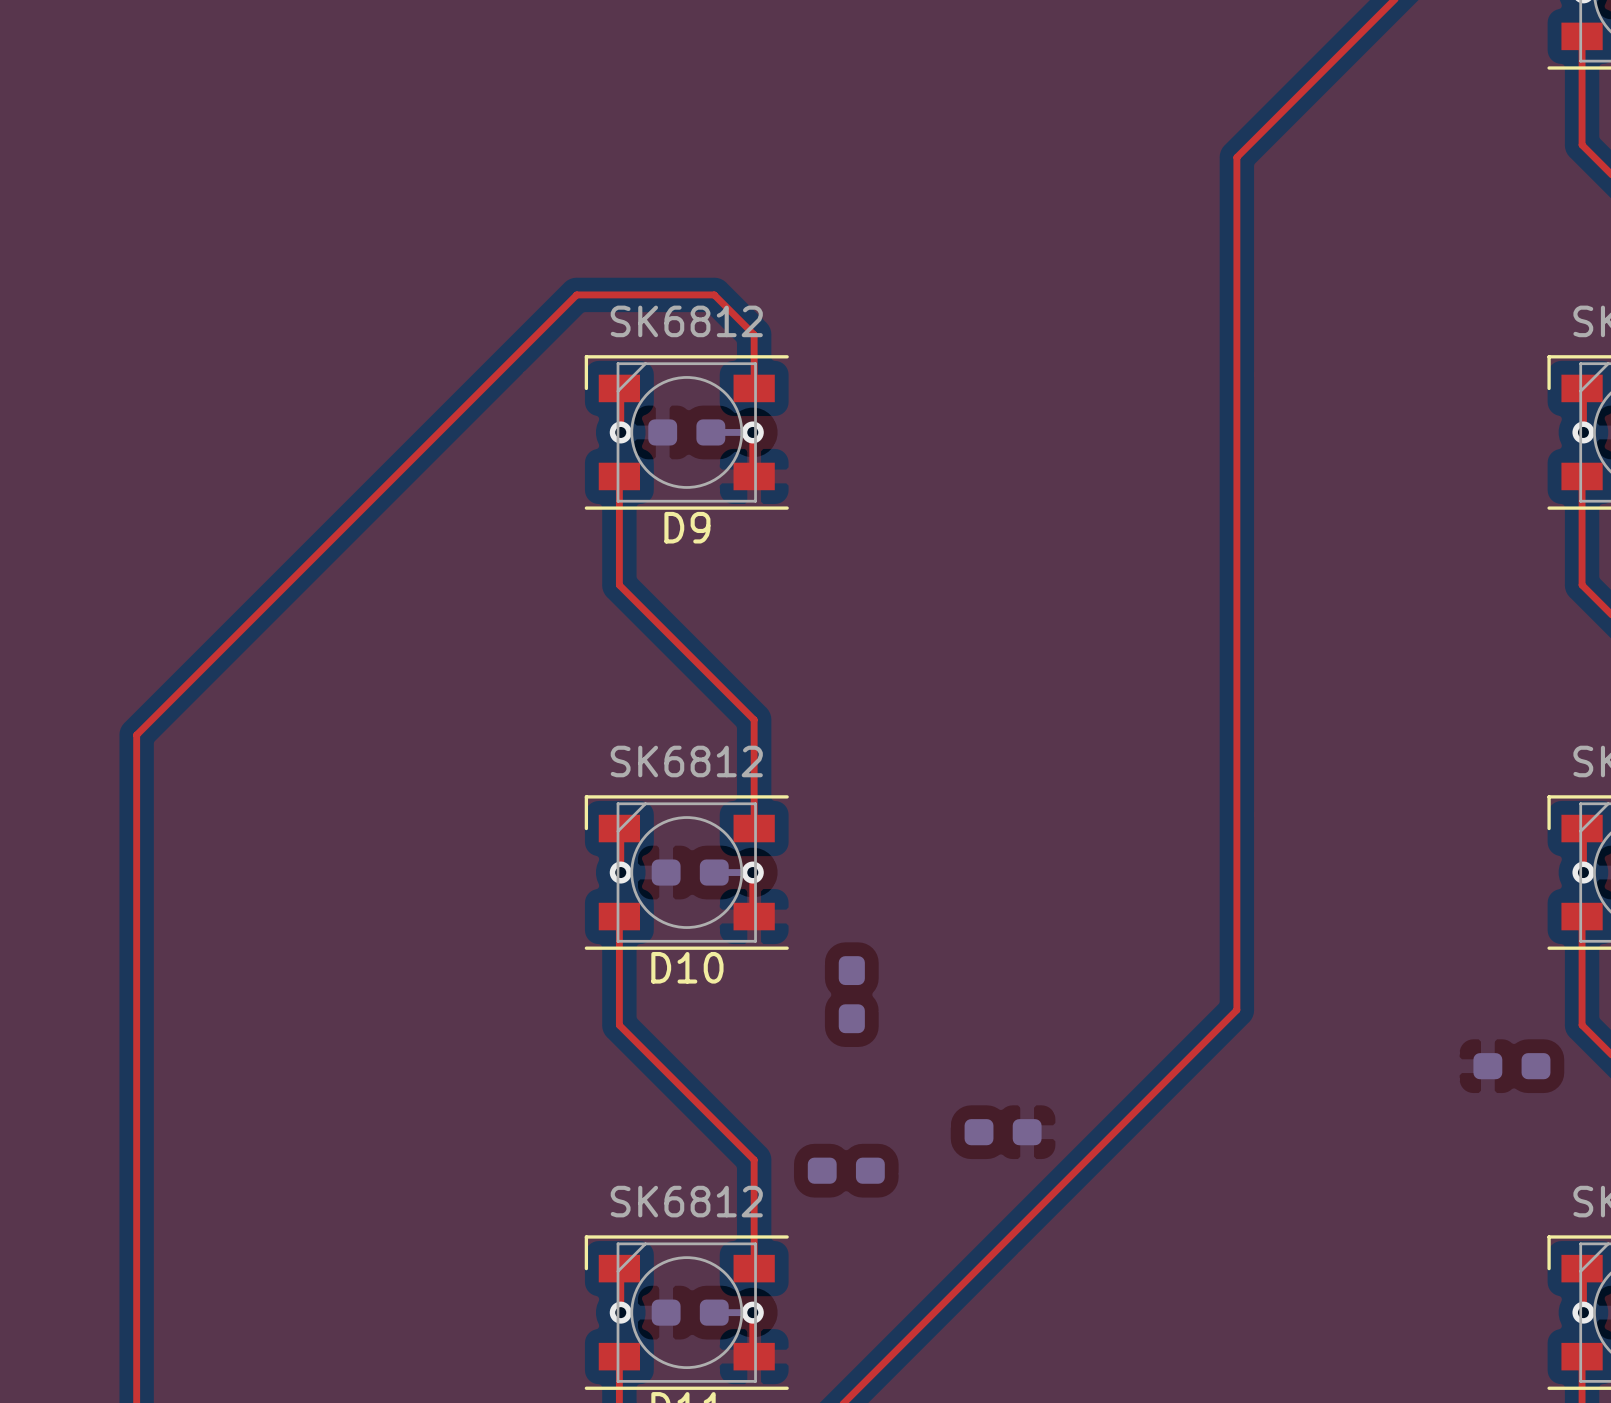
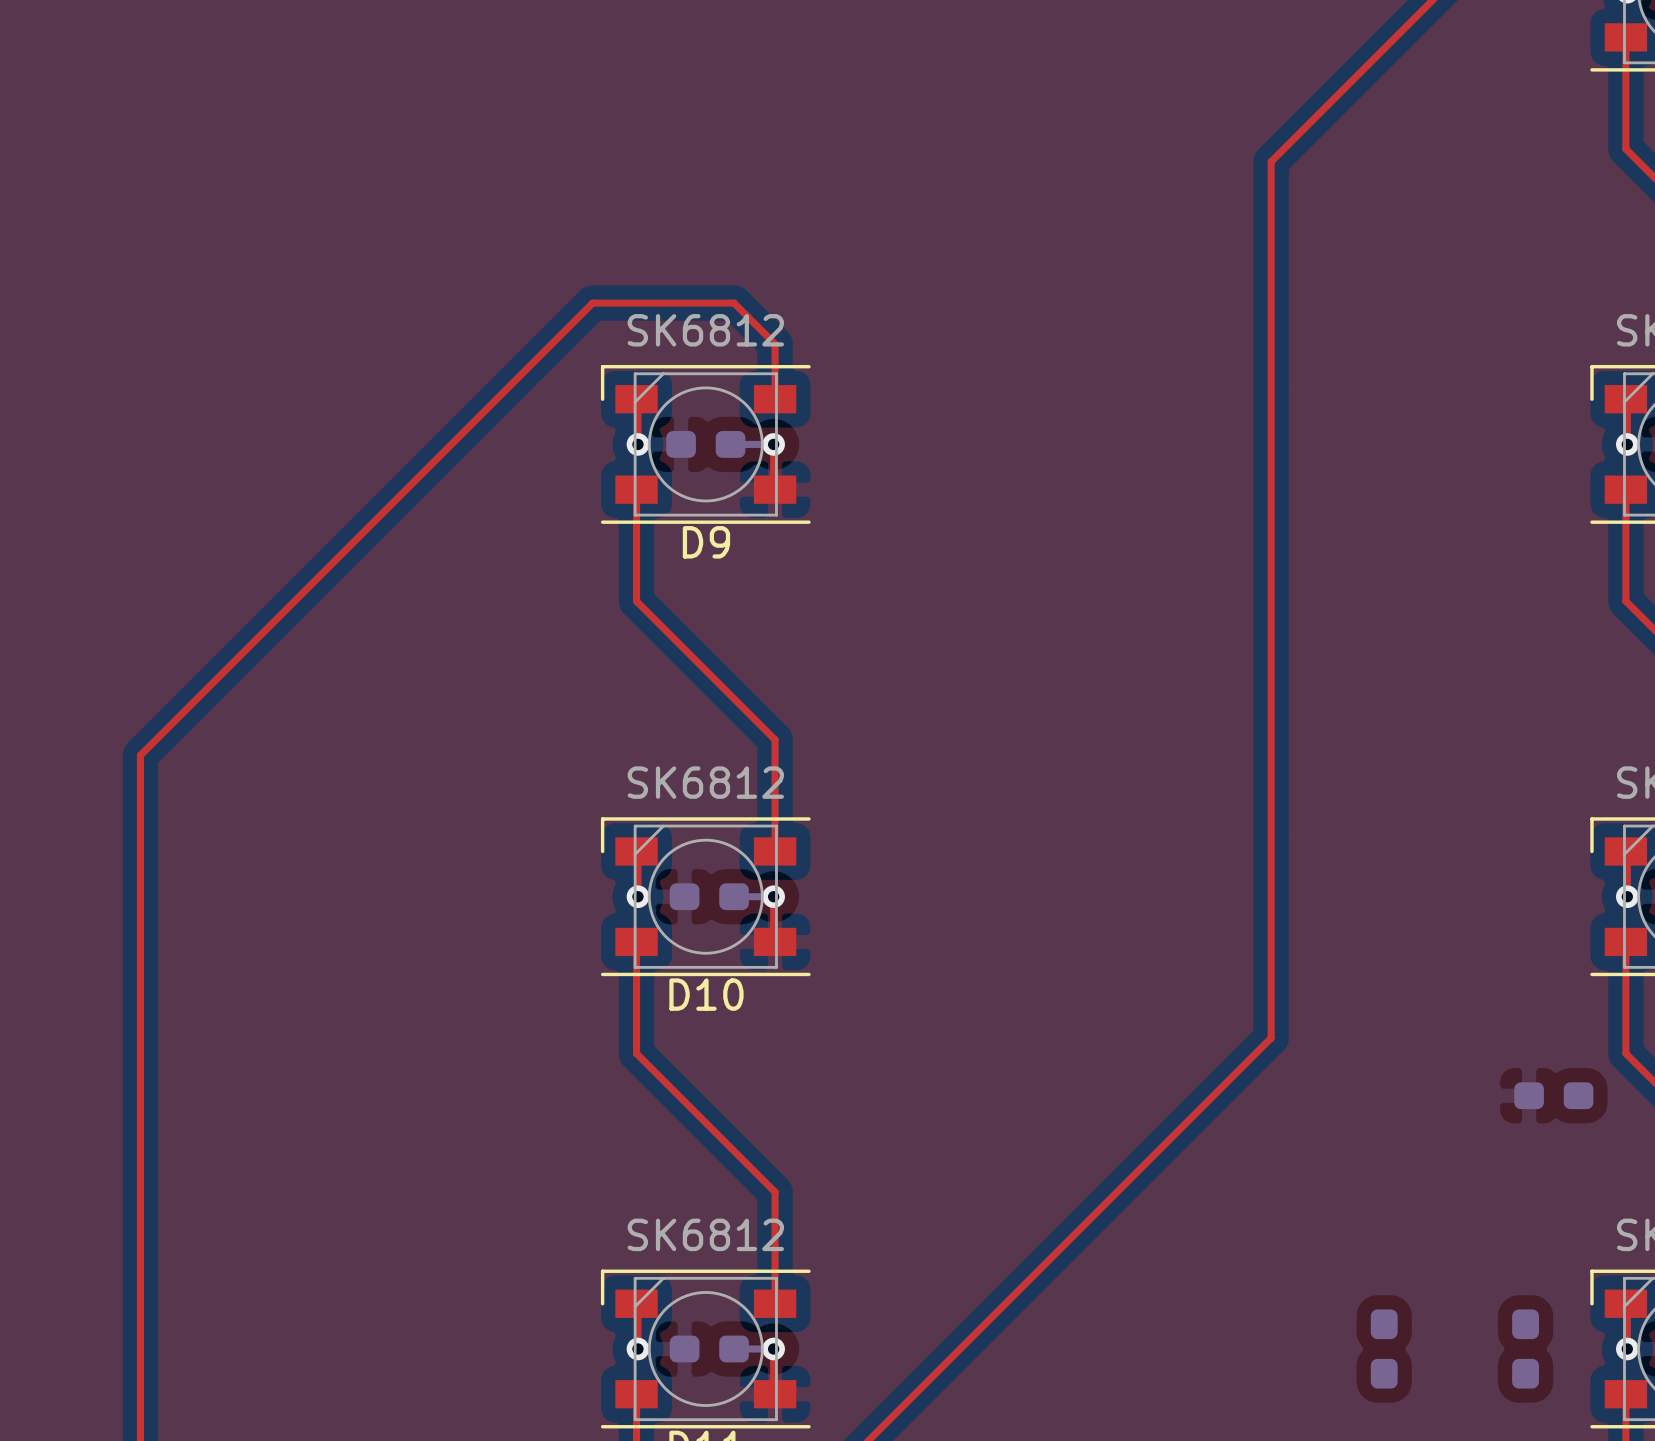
part: (851, 994) -> none
part: (1003, 1132) -> none
part: (846, 1170) -> none
part: none -> (1384, 1348)
part: none -> (1525, 1348)

